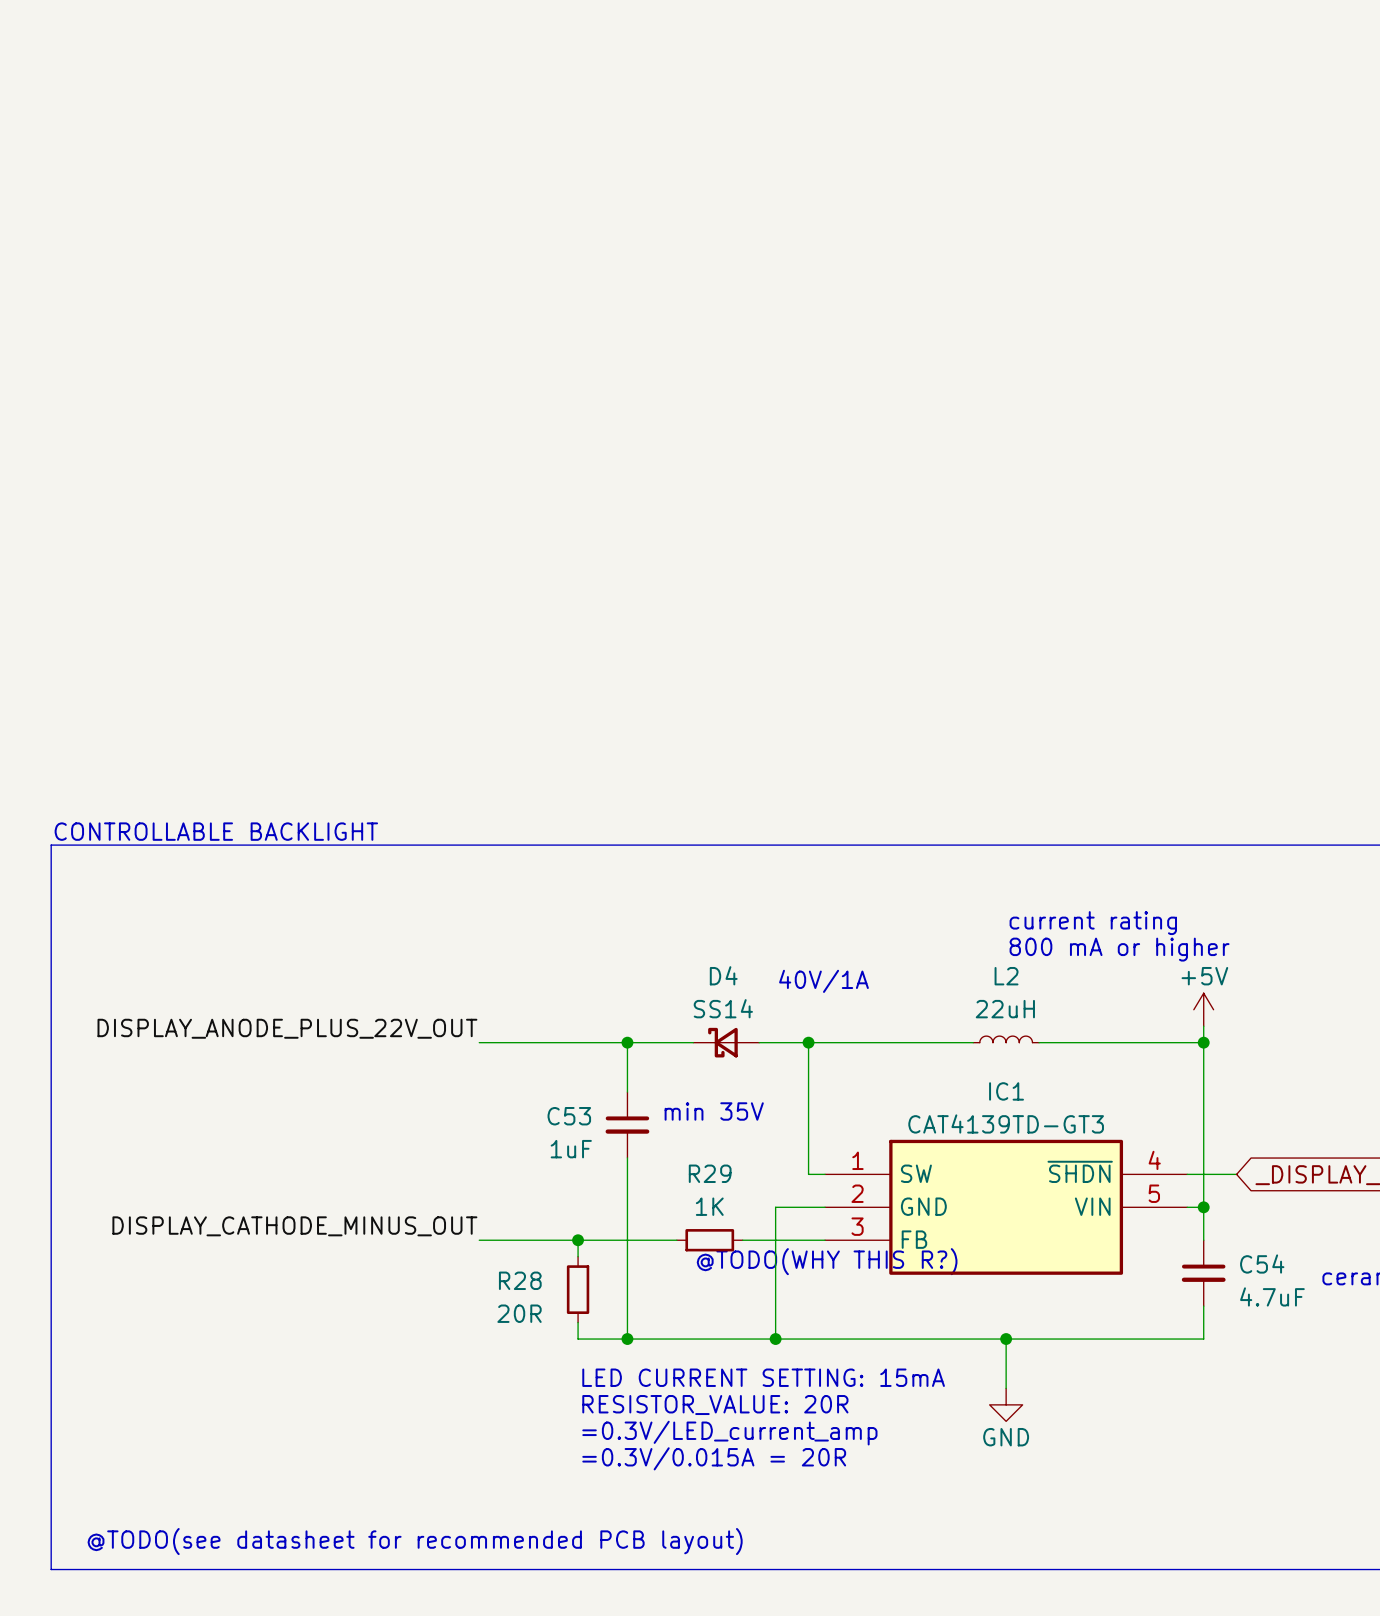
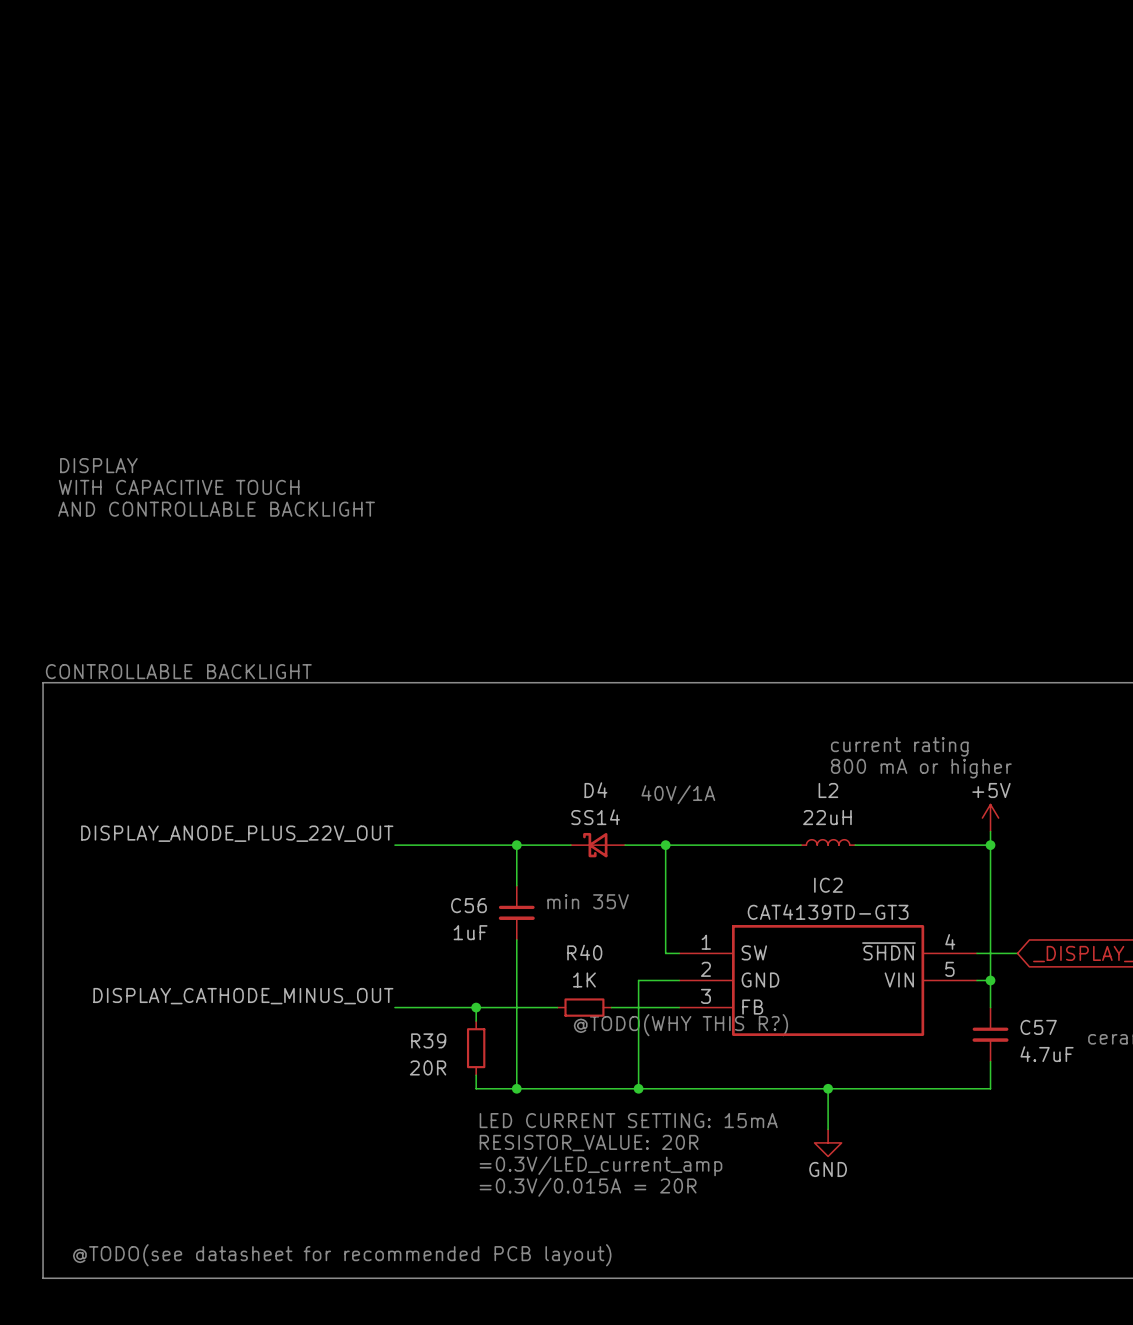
text: none -> DISPLAY (98, 465)
text: none -> WITH CAPACITIVE TOUCH (179, 487)
text: none -> AND CONTROLLABLE BACKLIGHT (216, 509)
IC1 name: IC1 (1006, 1091) -> IC2 (828, 885)
C53 name: C53 (569, 1116) -> C56 (468, 905)
R29 name: R29 (710, 1173) -> R40 (584, 952)
C54 name: C54 (1262, 1264) -> C57 (1038, 1027)
R28 name: R28 (520, 1280) -> R39 (428, 1040)

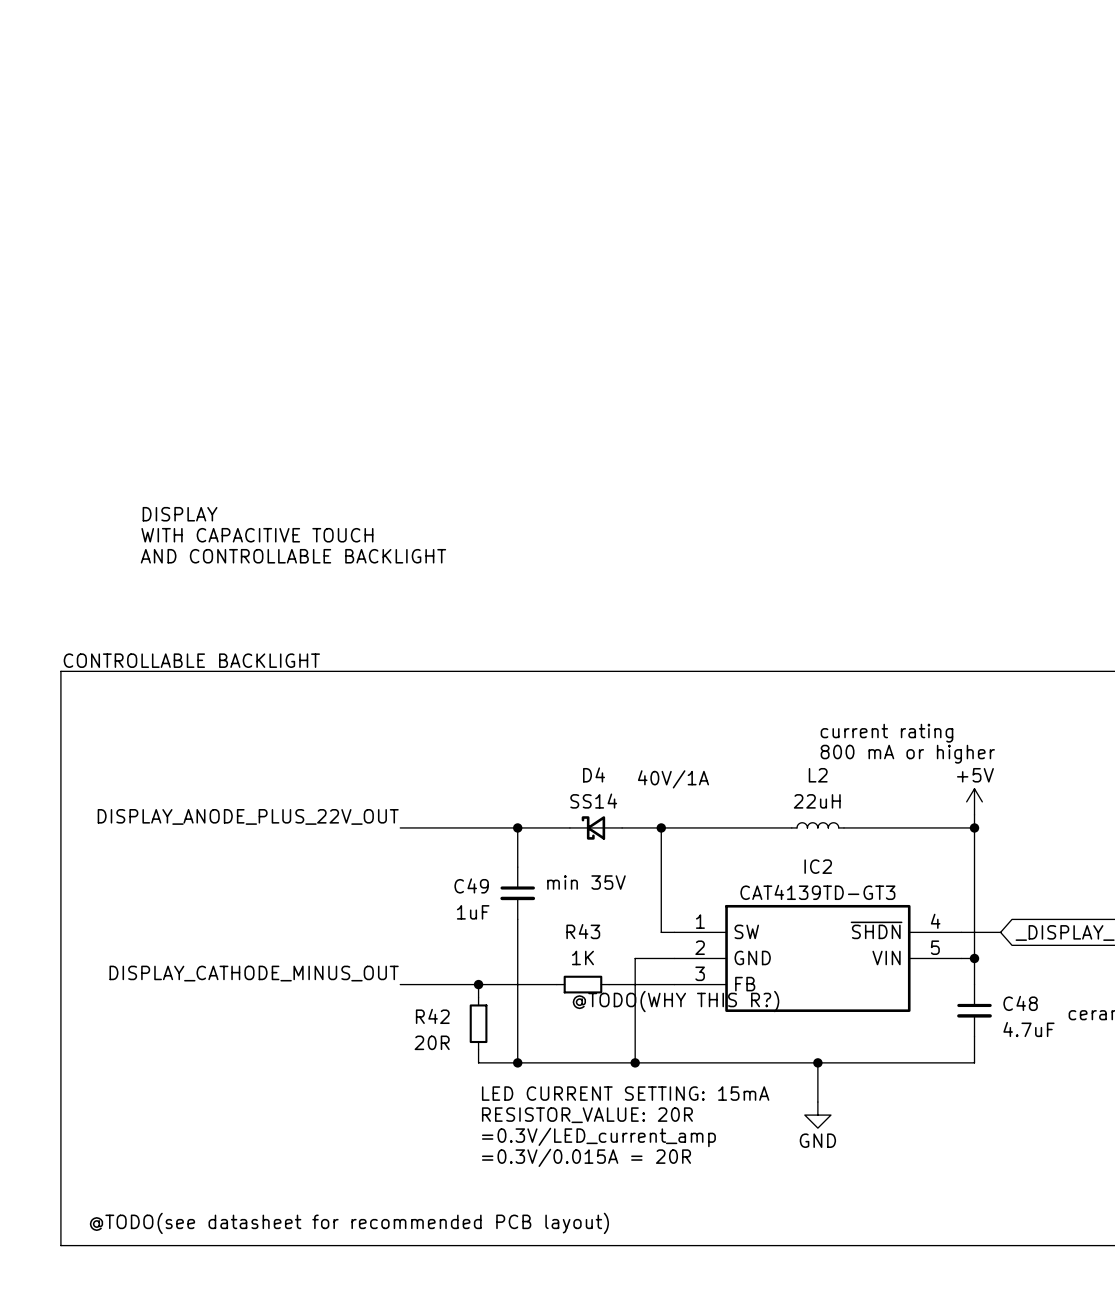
text position: DISPLAY (98, 465) -> DISPLAY (180, 514)
text position: WITH CAPACITIVE TOUCH (179, 487) -> WITH CAPACITIVE TOUCH (257, 535)
text position: AND CONTROLLABLE BACKLIGHT (216, 509) -> AND CONTROLLABLE BACKLIGHT (293, 556)
C56 name: C56 (468, 905) -> C49 (471, 885)
R40 name: R40 (584, 952) -> R43 (583, 931)
C57 name: C57 (1038, 1027) -> C48 (1020, 1003)
R39 name: R39 (428, 1040) -> R42 (432, 1016)

